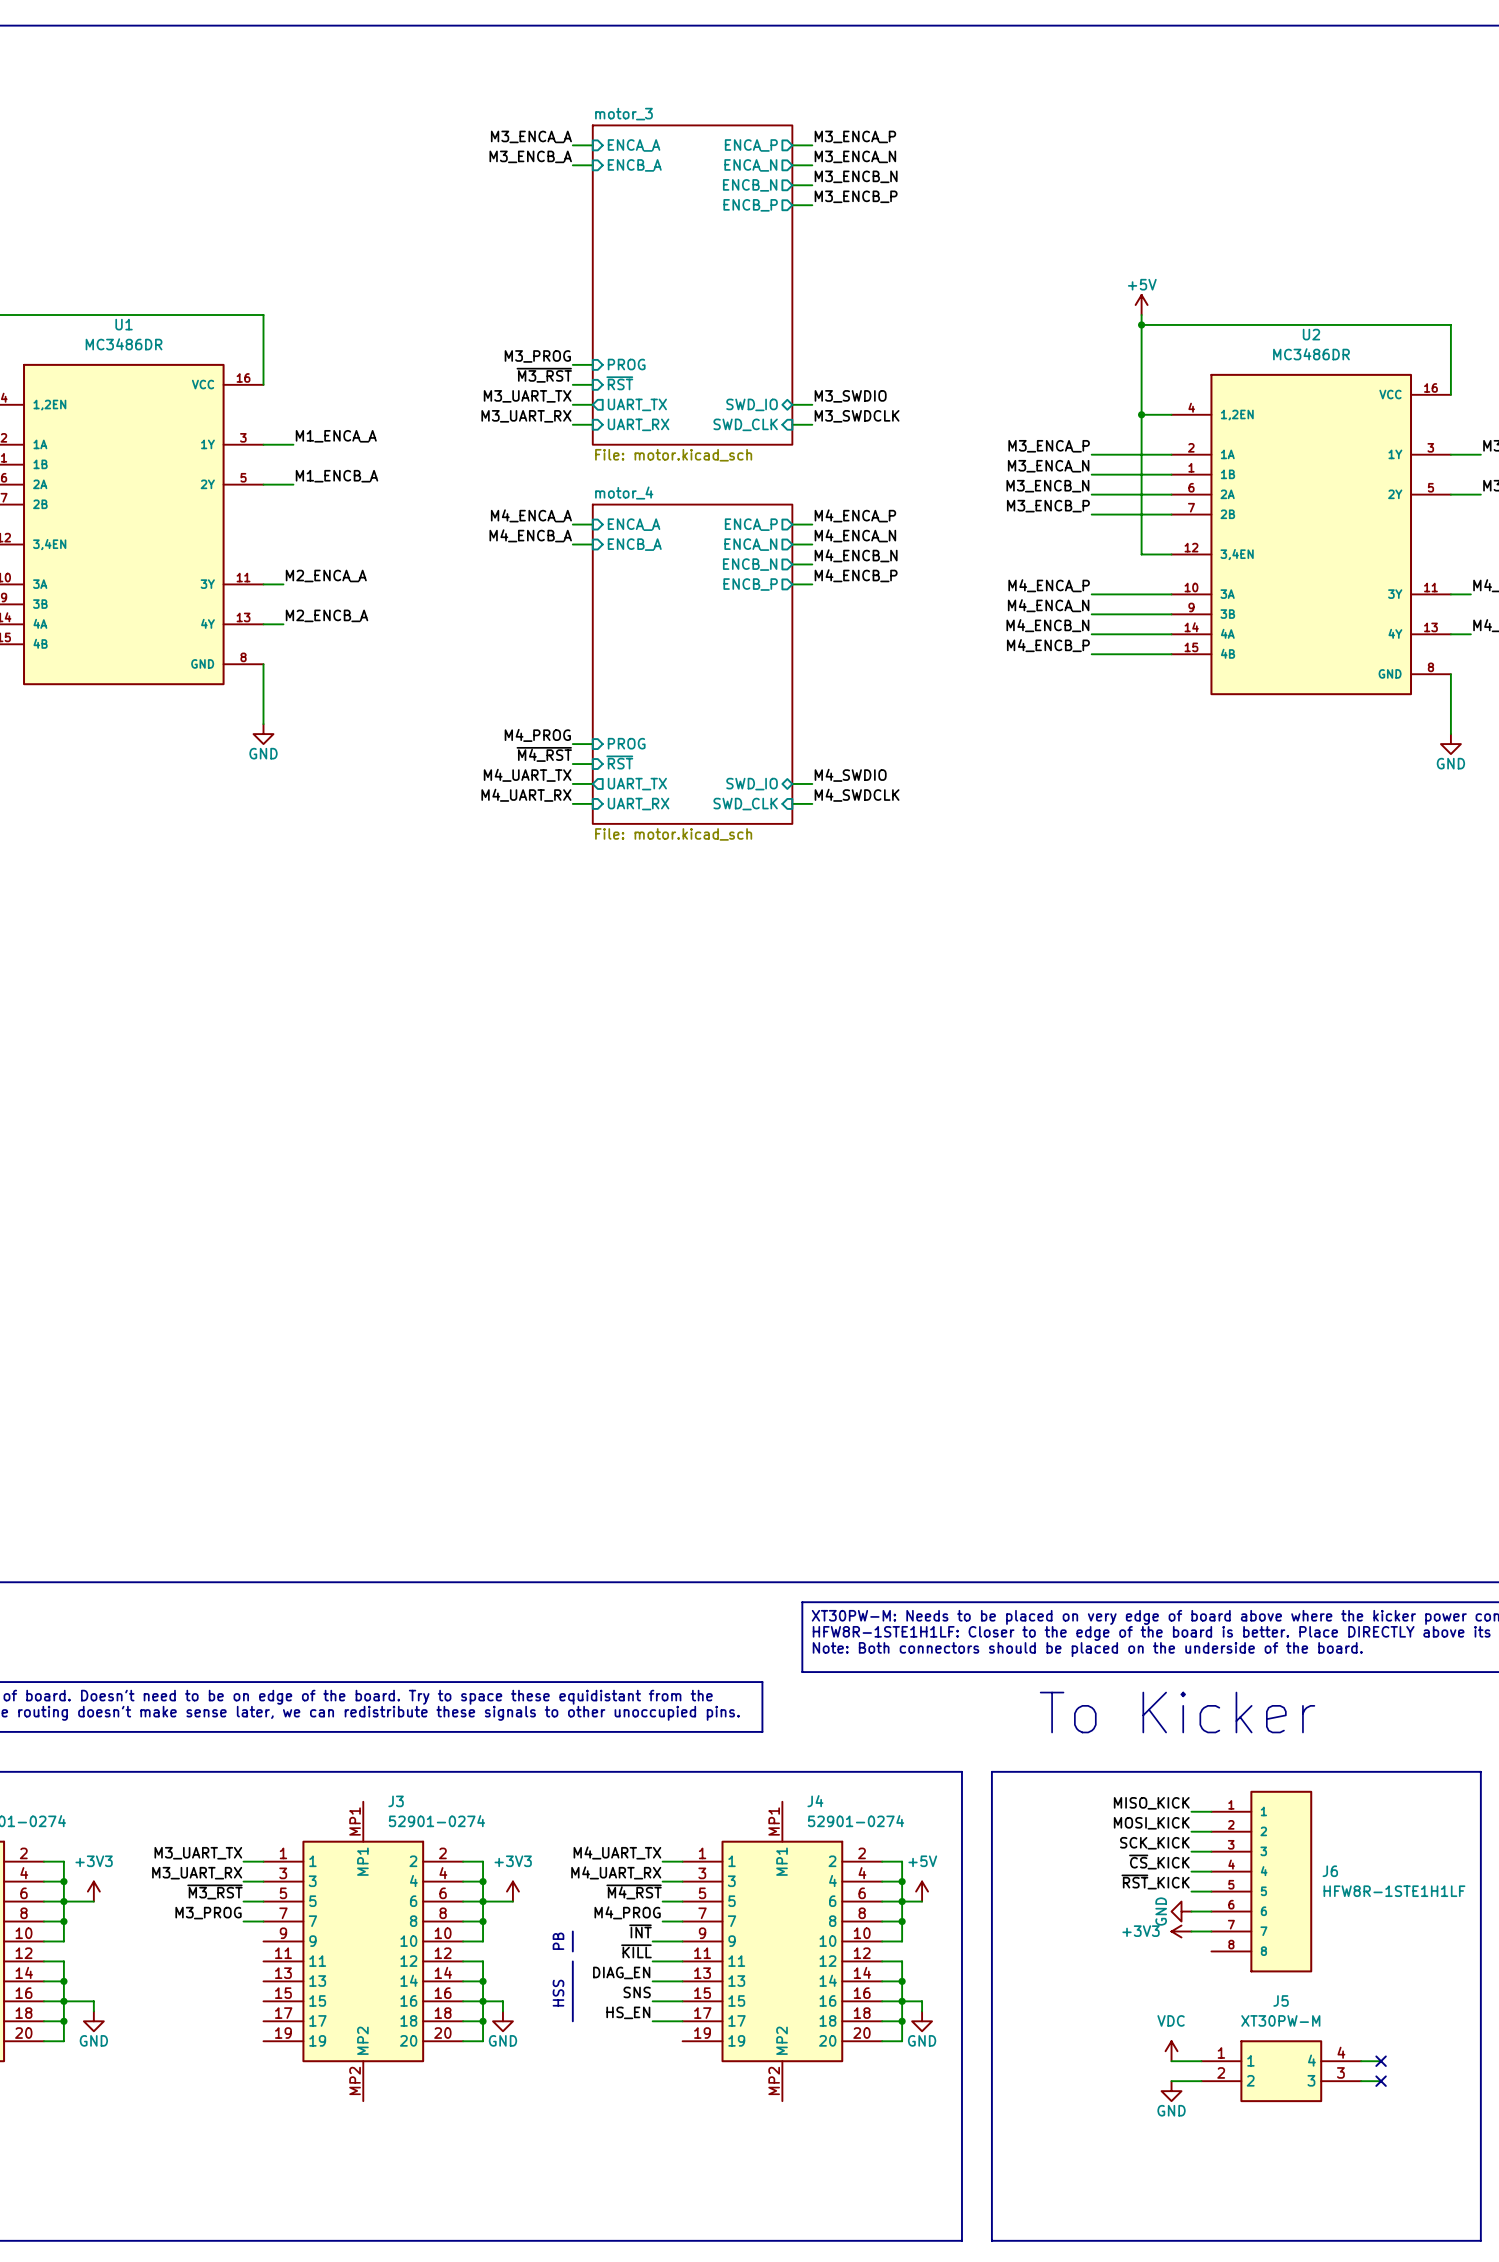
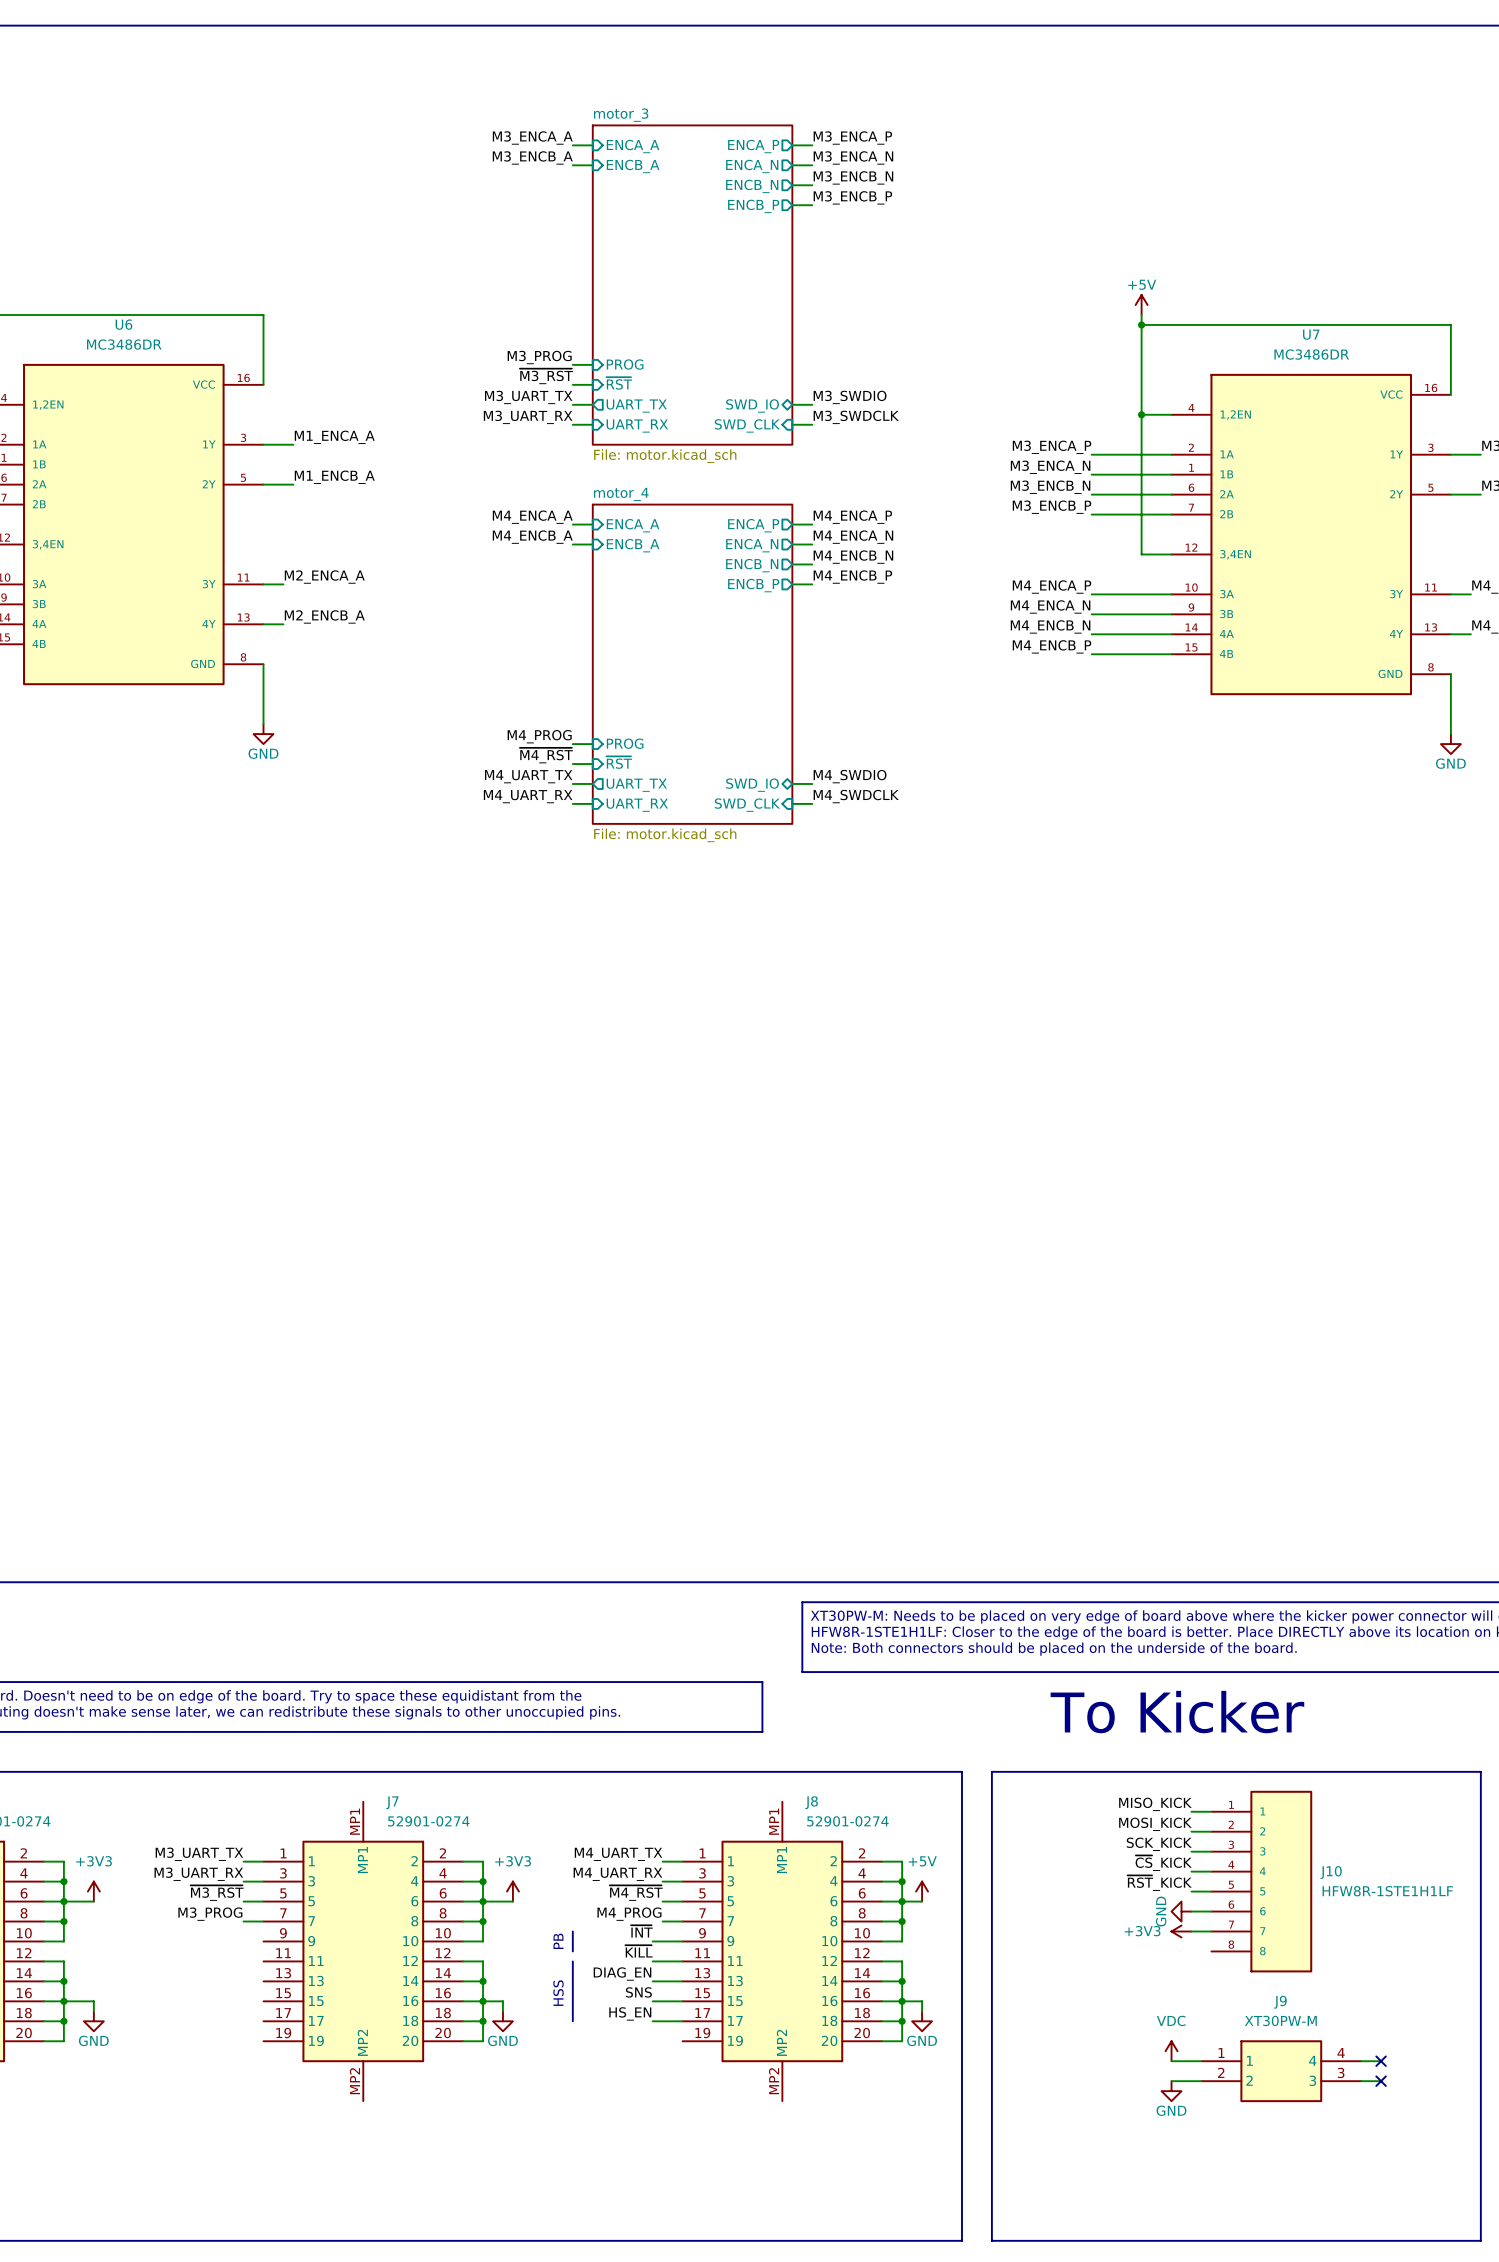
U1 name: U1 (124, 324) -> U6 (123, 324)
U2 name: U2 (1311, 334) -> U7 (1311, 334)
J3 name: J3 (396, 1801) -> J7 (392, 1802)
J4 name: J4 (815, 1801) -> J8 (811, 1802)
J6 name: J6 (1330, 1871) -> J10 (1331, 1872)
J5 name: J5 (1281, 2000) -> J9 (1280, 2002)

